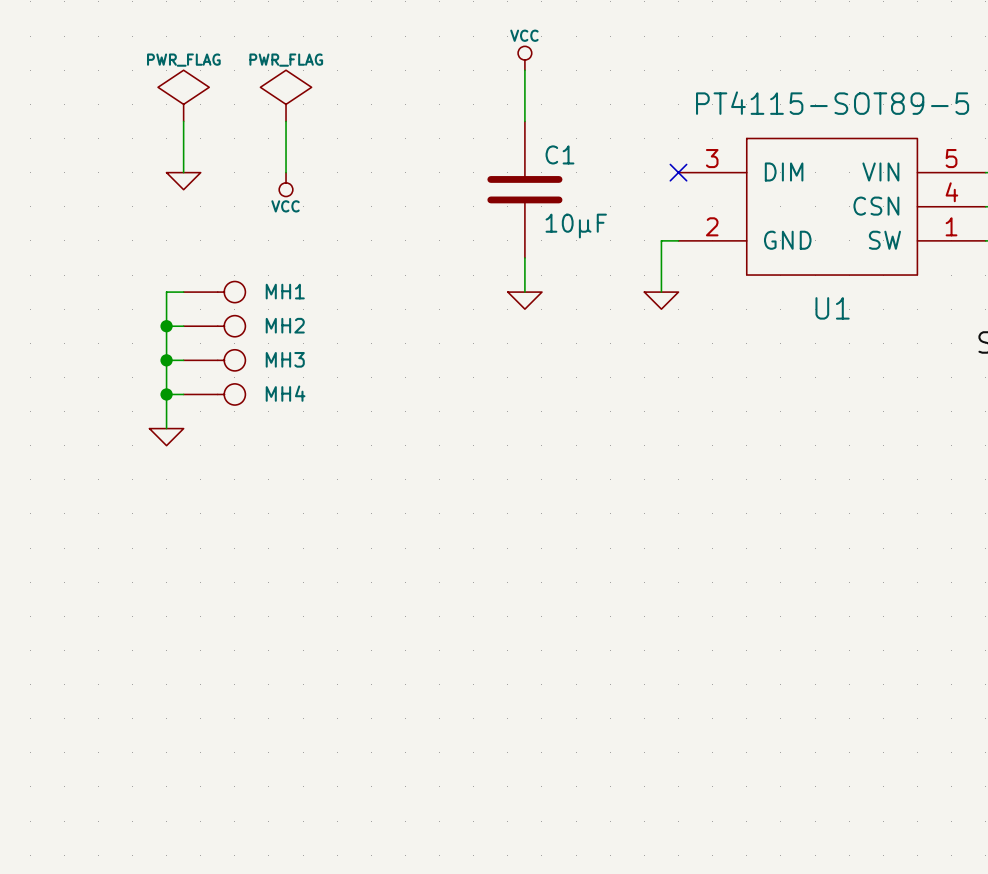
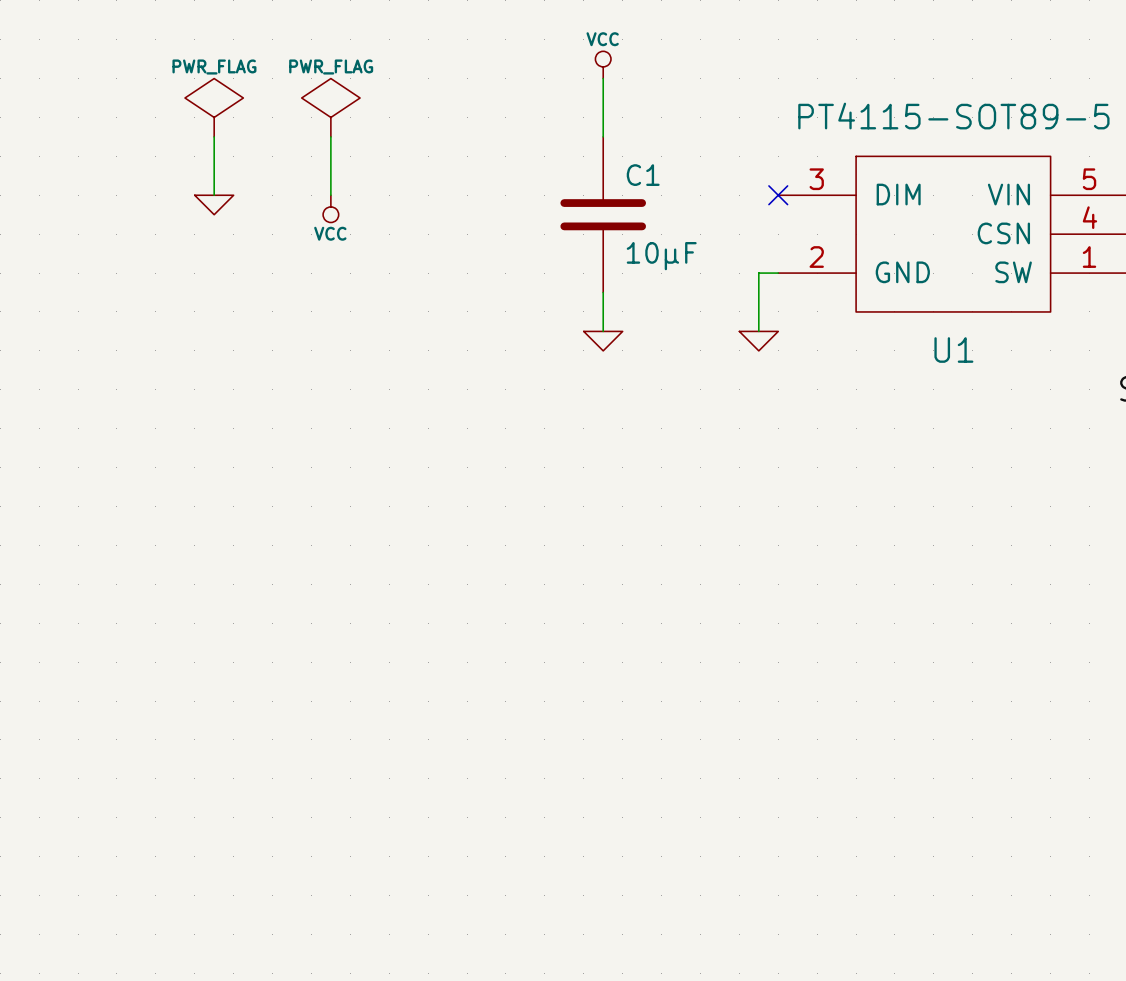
wire: (183, 292) (166, 292) (166, 428) -> none
MH1: (214, 292) -> none
wire: (166, 326) (183, 326) -> none
junction: (166, 326) -> none
MH2: (214, 326) -> none
wire: (166, 360) (183, 360) -> none
junction: (166, 360) -> none
MH3: (214, 360) -> none
wire: (166, 394) (183, 394) -> none
junction: (166, 394) -> none
MH4: (214, 394) -> none
power symbol: (166, 437) -> none

